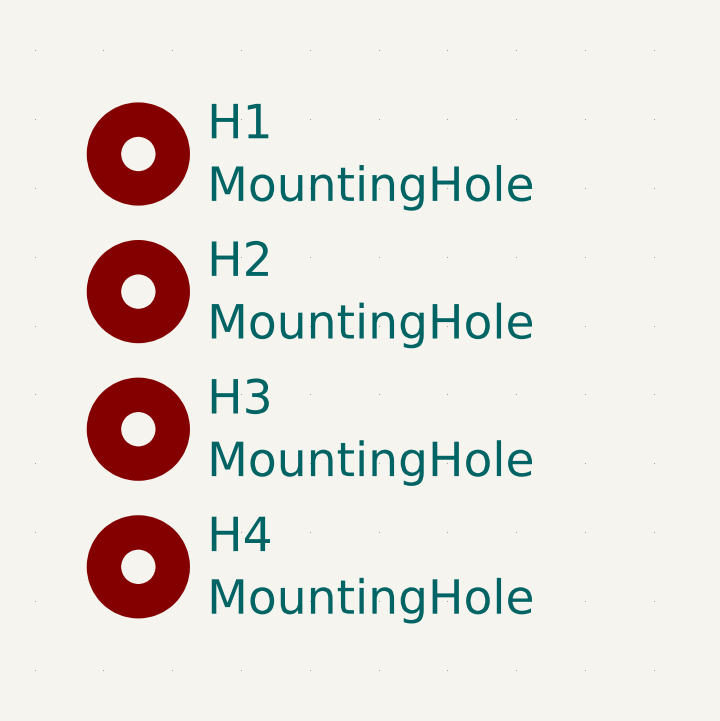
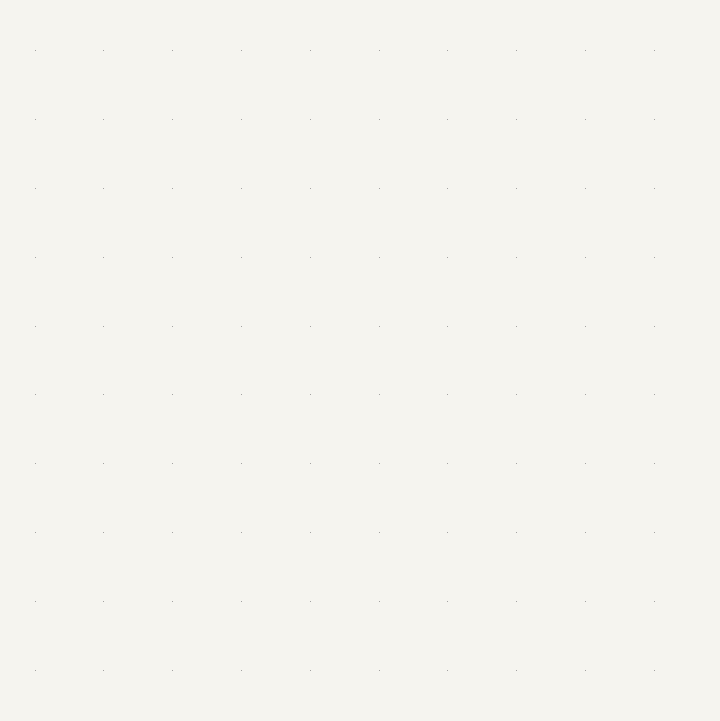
H1: MountingHole (138, 154) -> none
H2: MountingHole (138, 291) -> none
H3: MountingHole (138, 429) -> none
H4: MountingHole (138, 566) -> none

